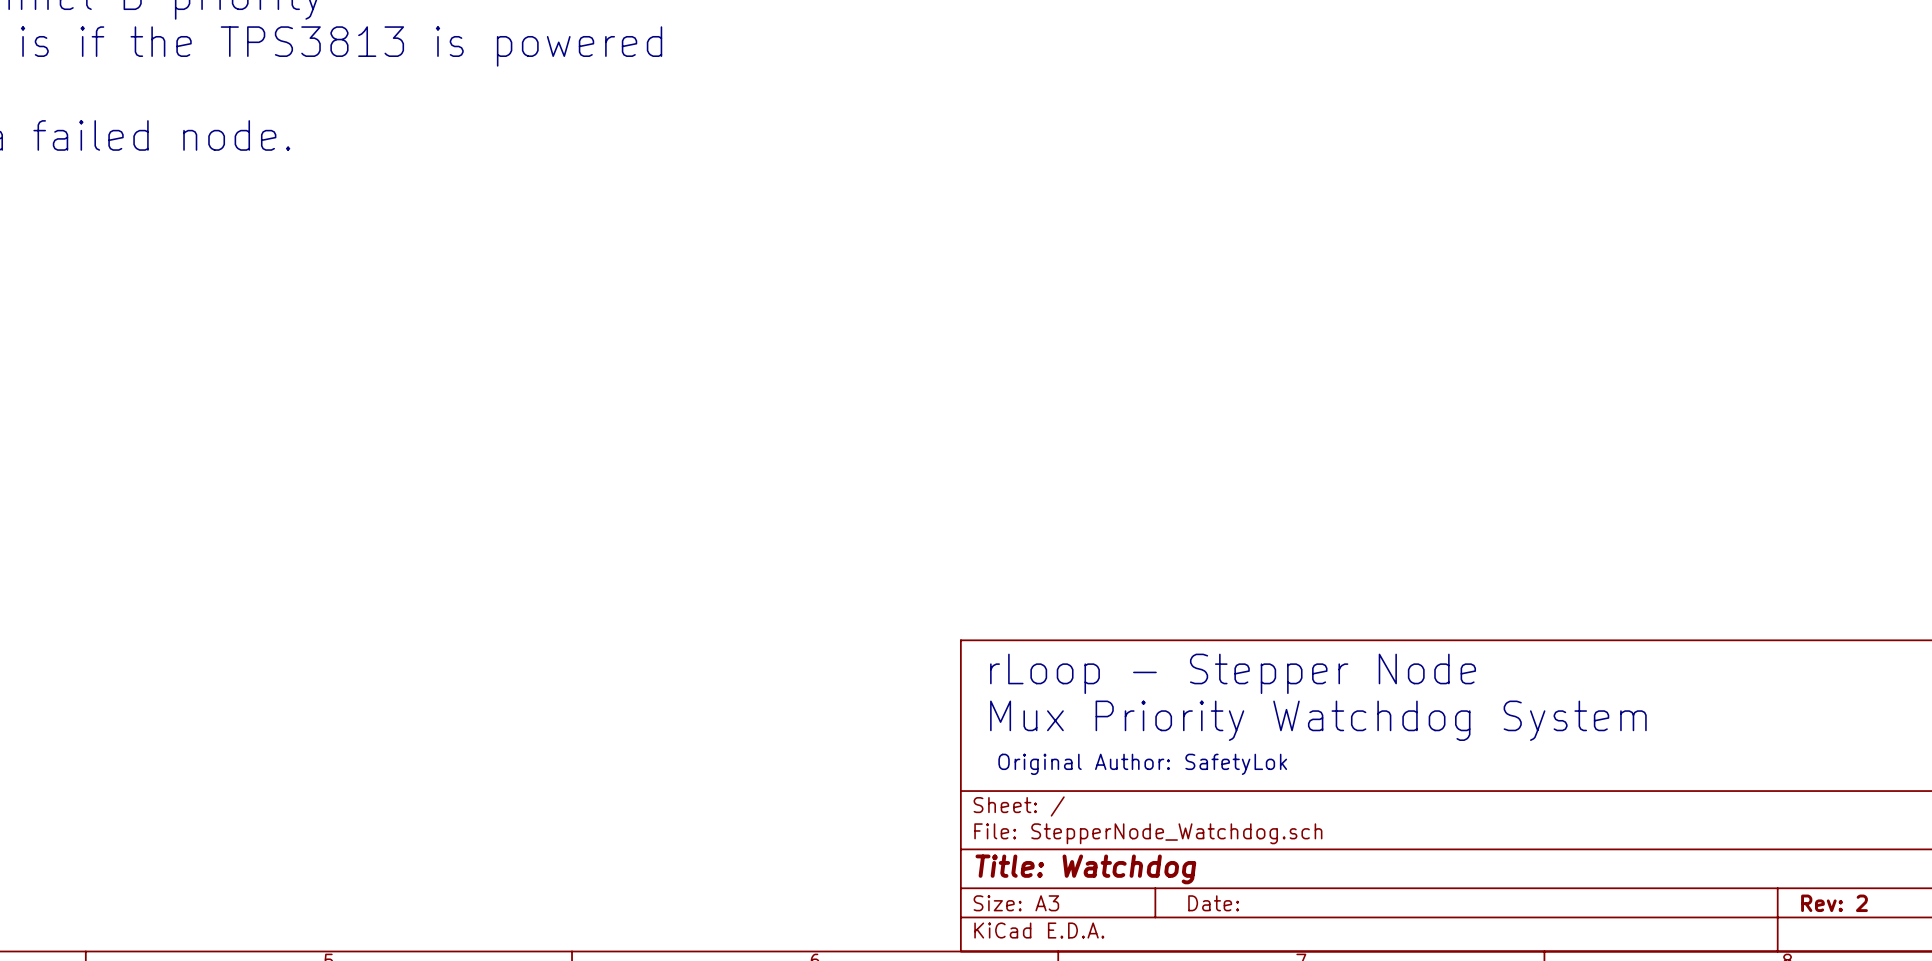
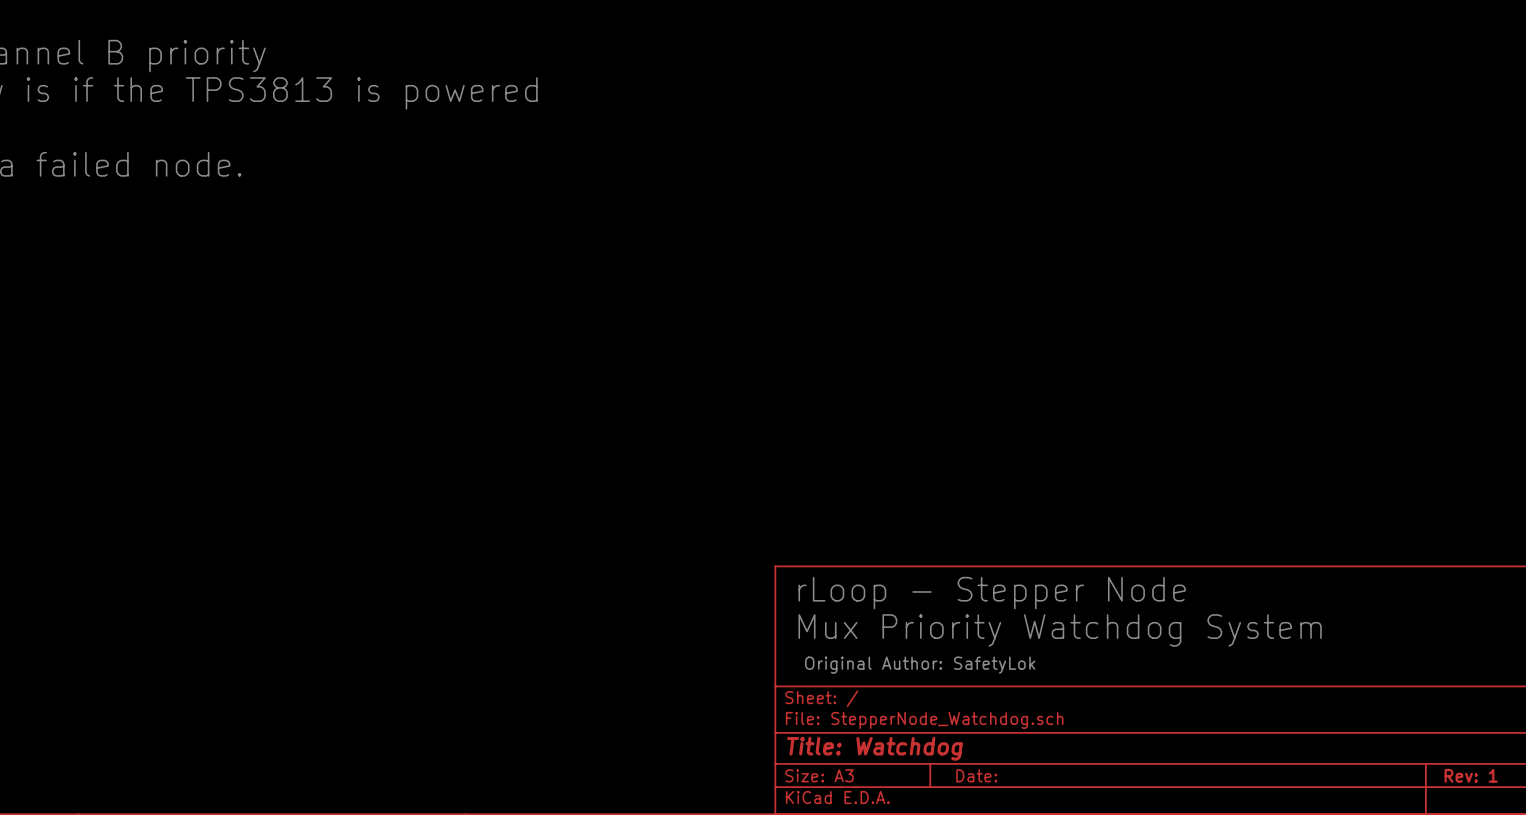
title block: Rev: 2 (1834, 903) -> Rev: 1 (1471, 775)

